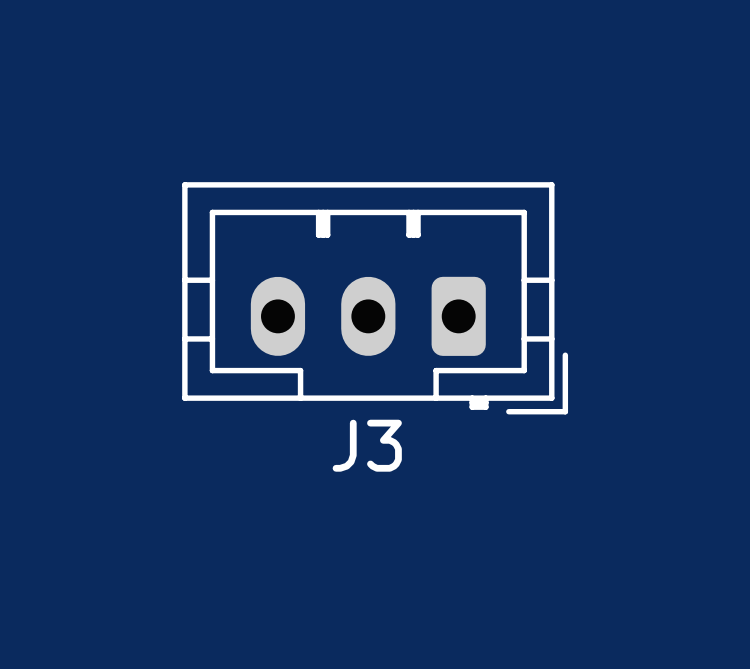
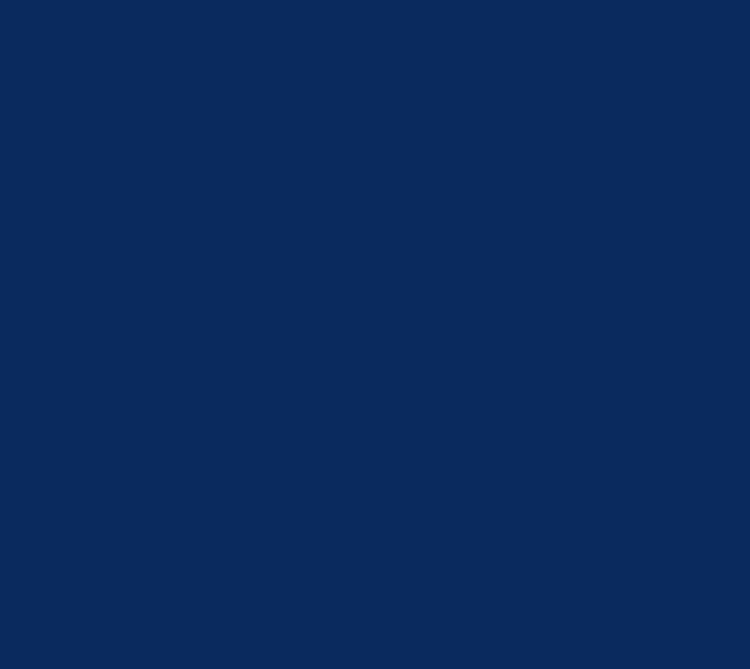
J3: (375, 298) -> none

